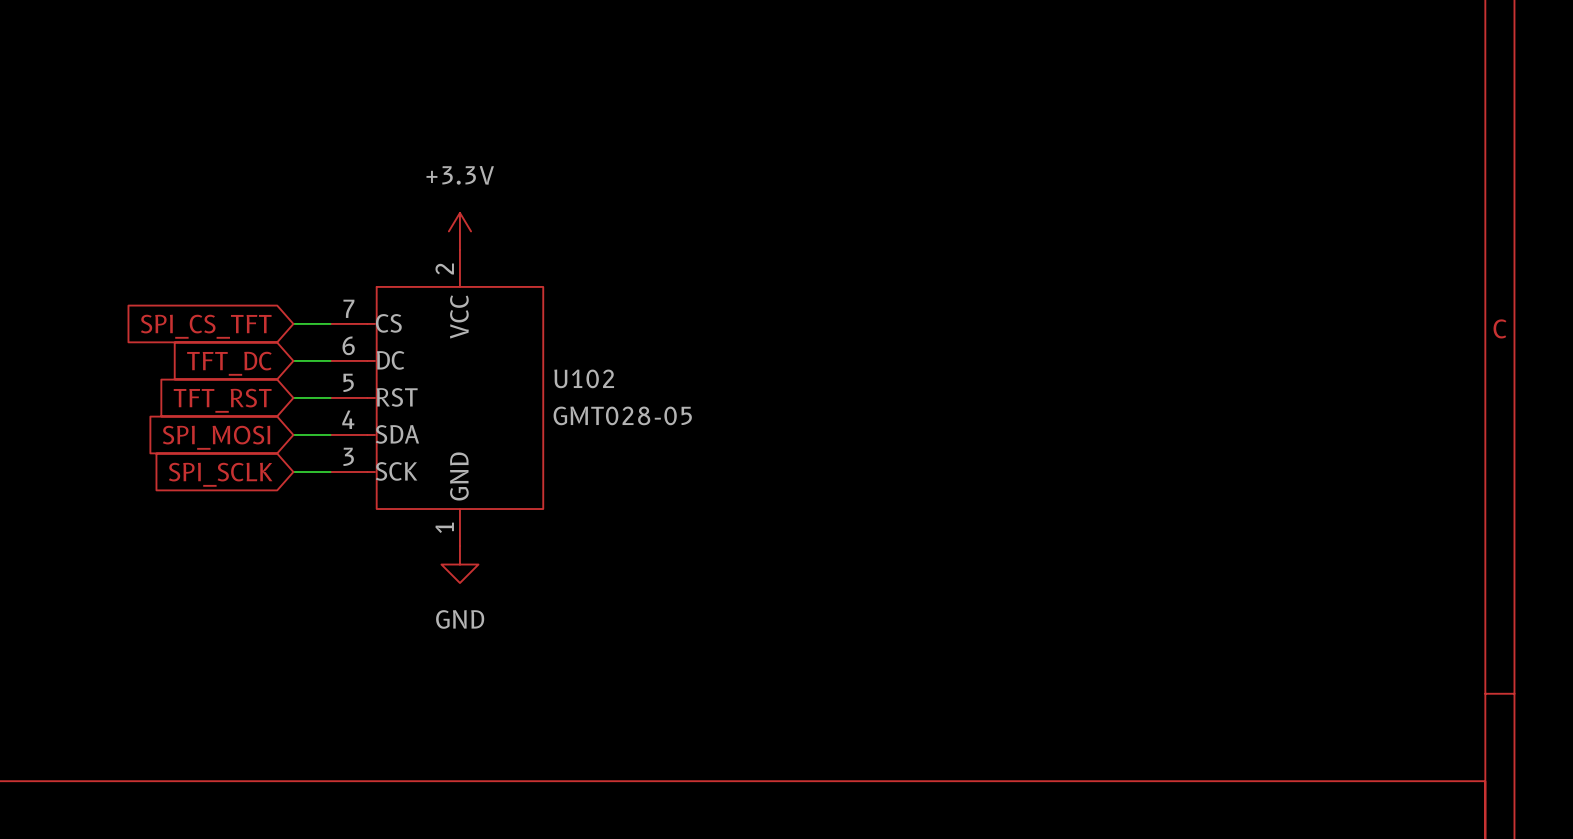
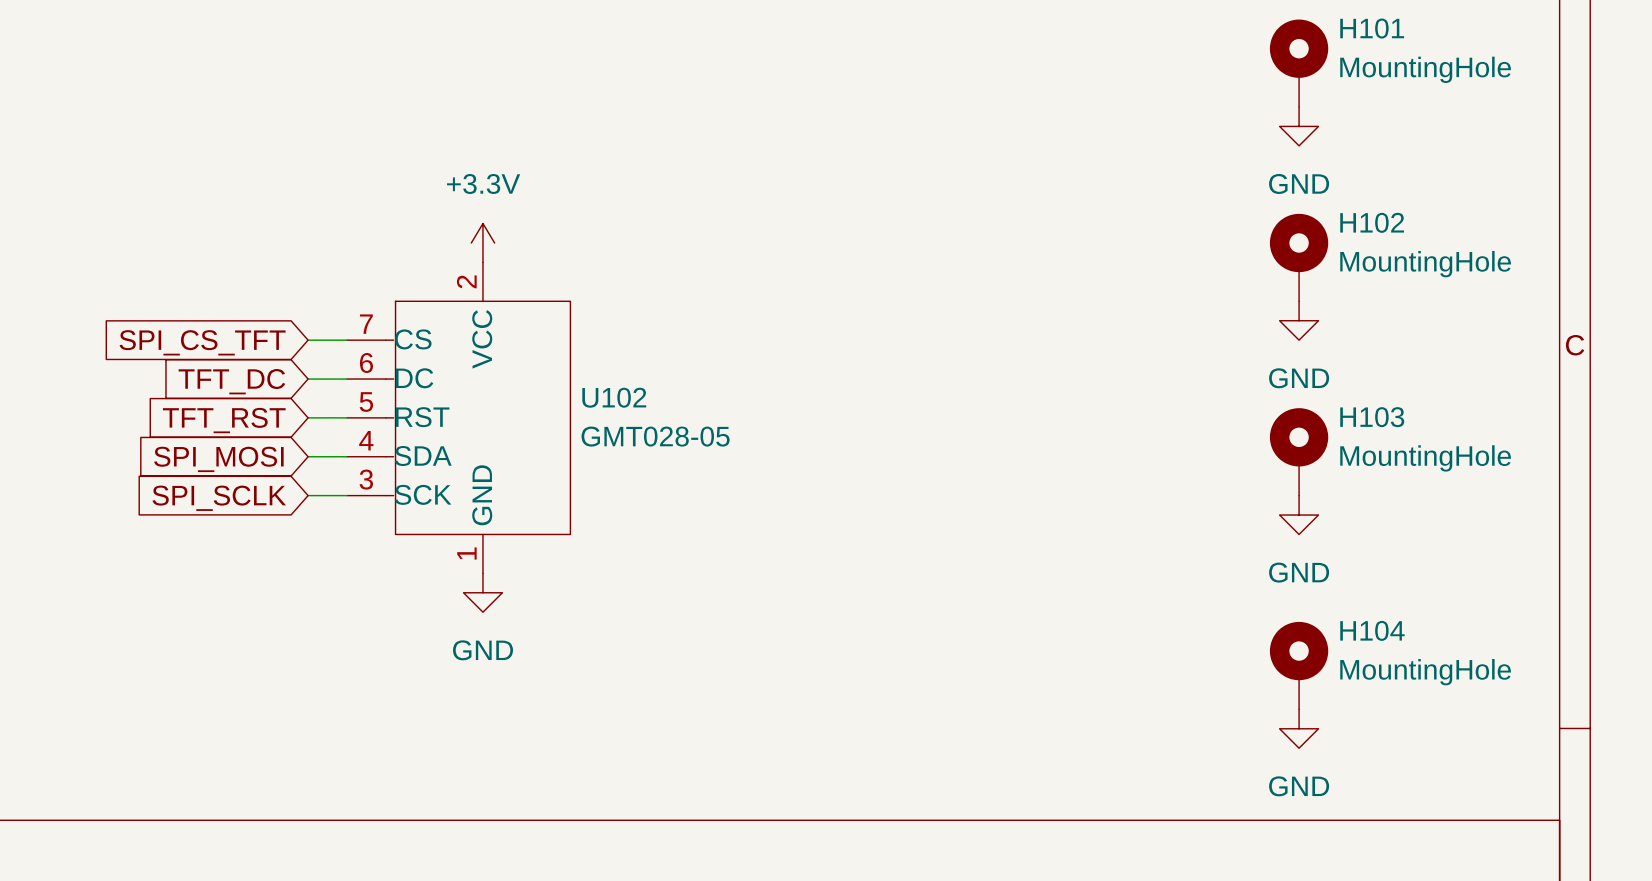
H101: none -> MountingHole (1299, 63)
power symbol: none -> GND (1299, 126)
H102: none -> MountingHole (1299, 257)
power symbol: none -> GND (1299, 320)
H103: none -> MountingHole (1299, 451)
power symbol: none -> GND (1299, 515)
H104: none -> MountingHole (1299, 665)
power symbol: none -> GND (1299, 728)

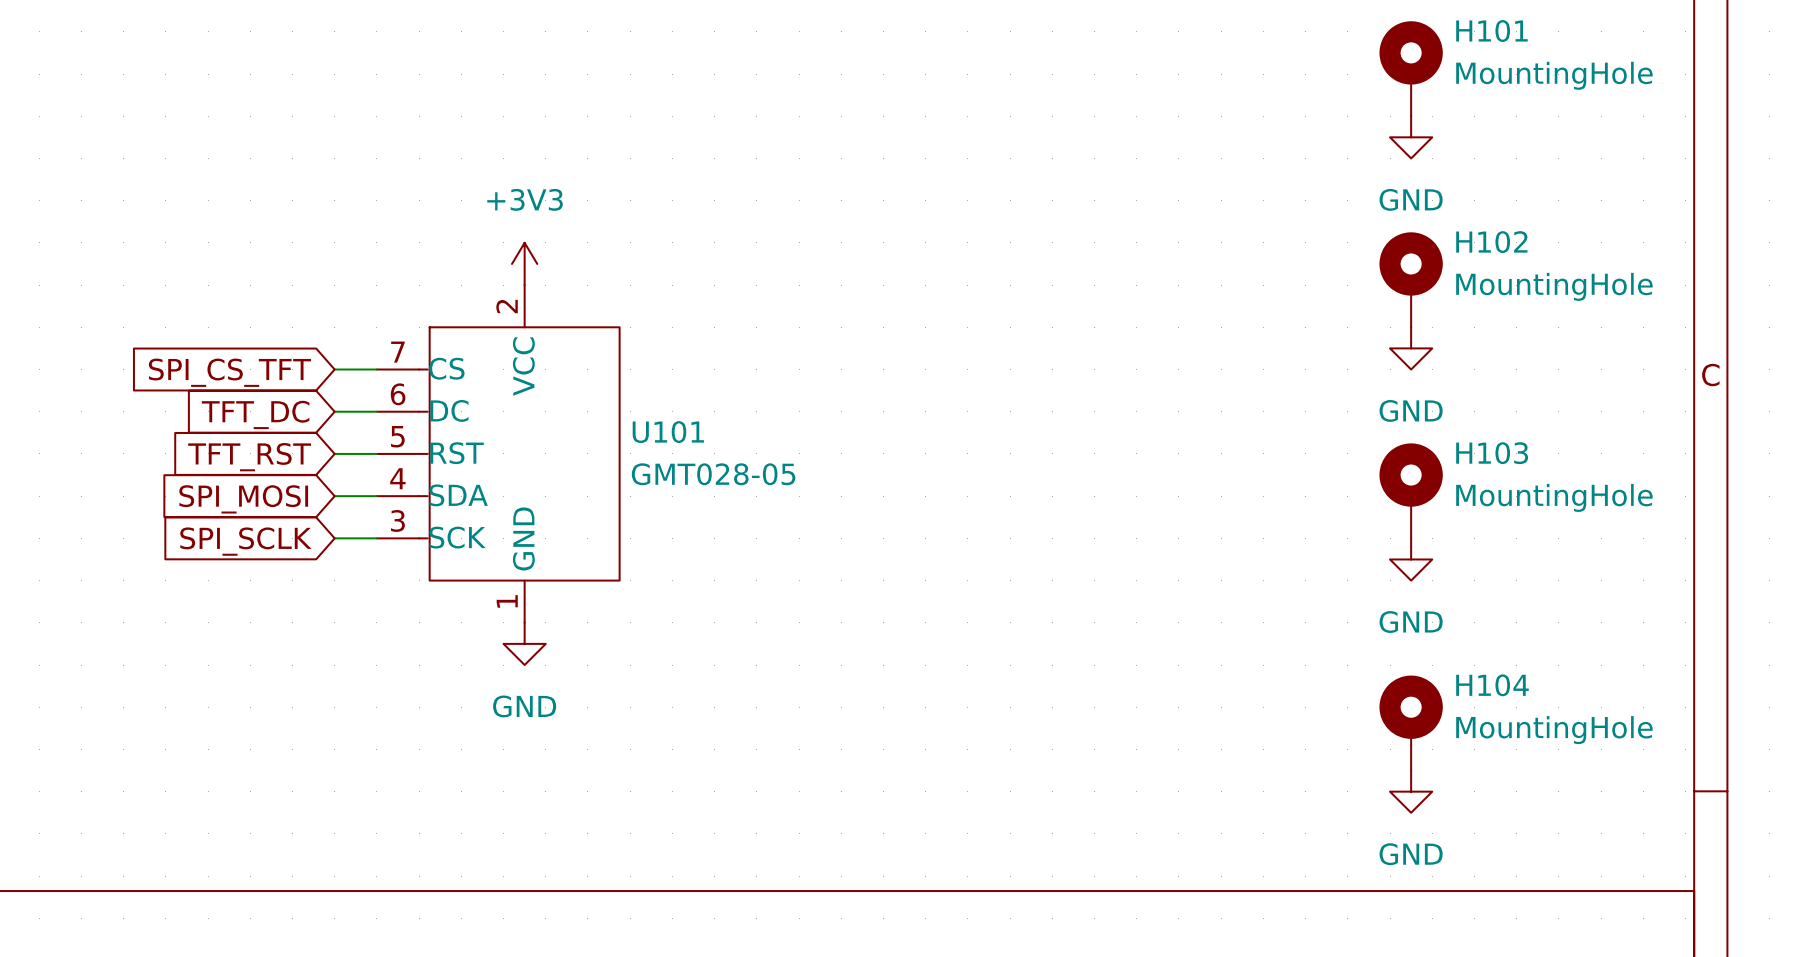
power symbol: +3.3V (482, 243) -> +3V3 (524, 263)
U102 name: U102 (614, 397) -> U101 (668, 432)

